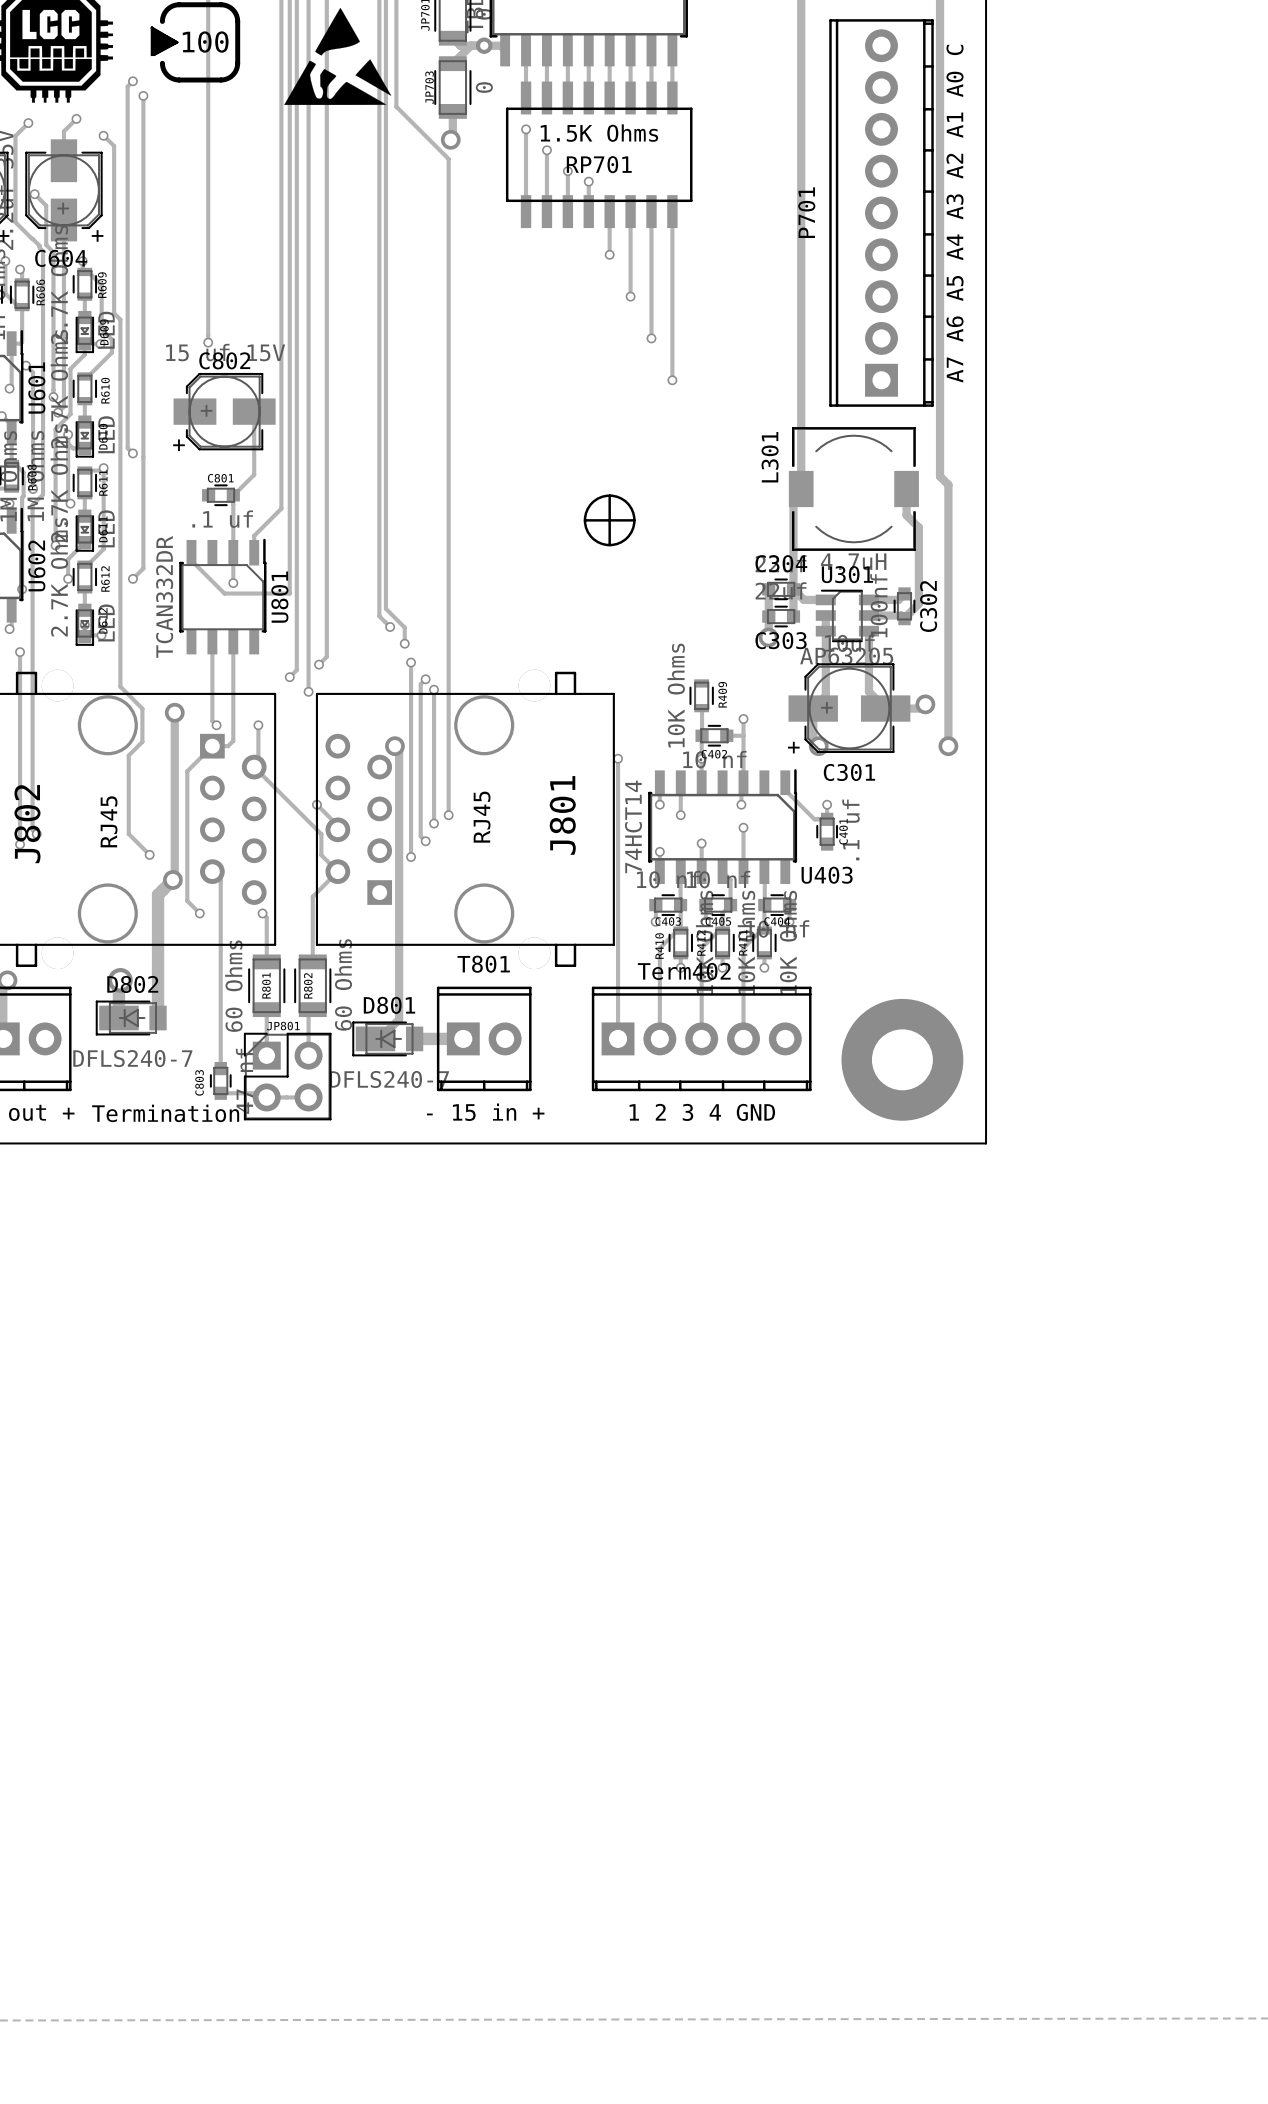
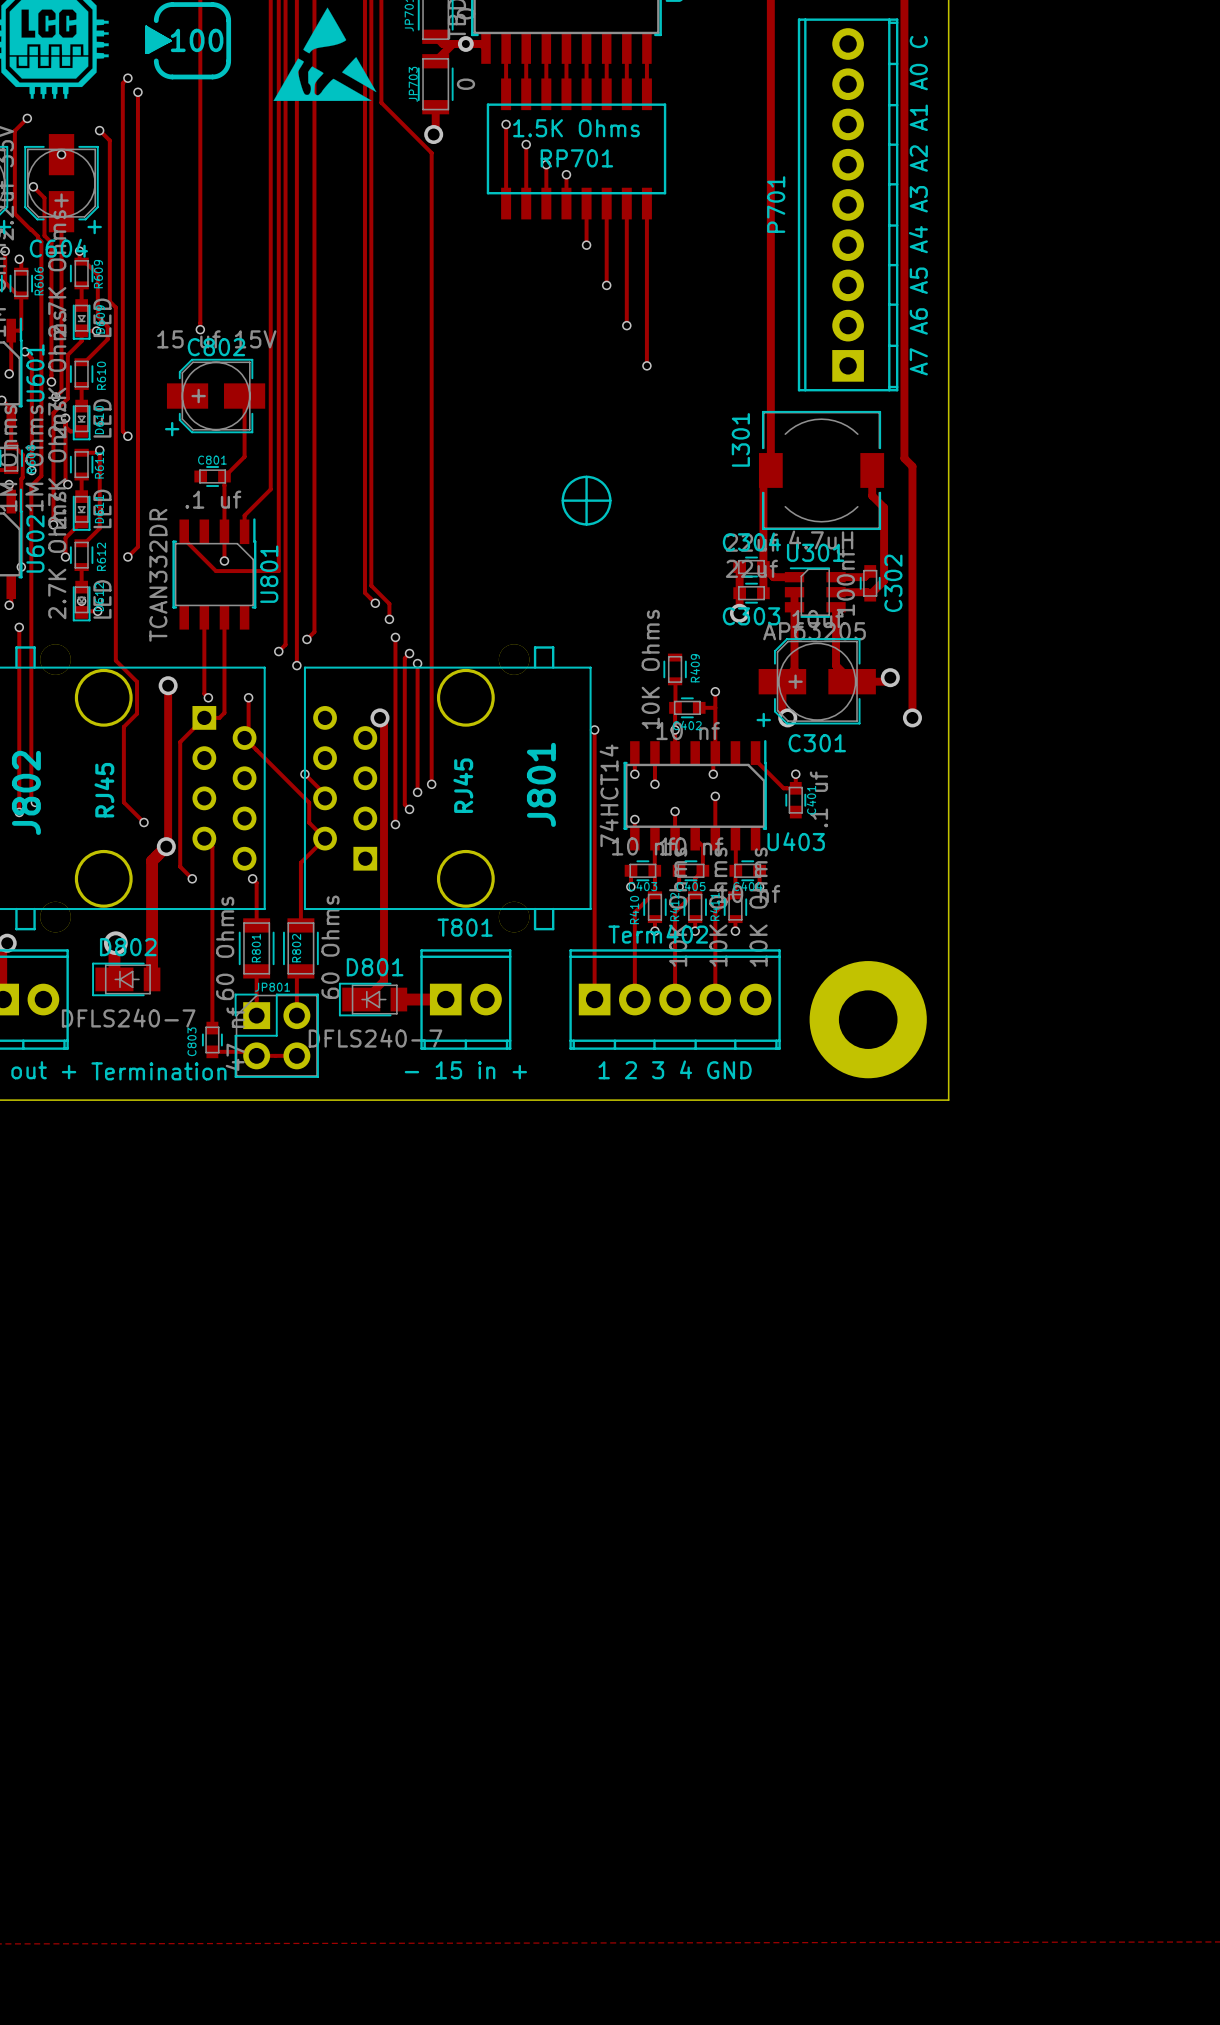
track: (76, 118) (63, 131) (63, 160) -> none
via position: (76, 118) -> (61, 154)

